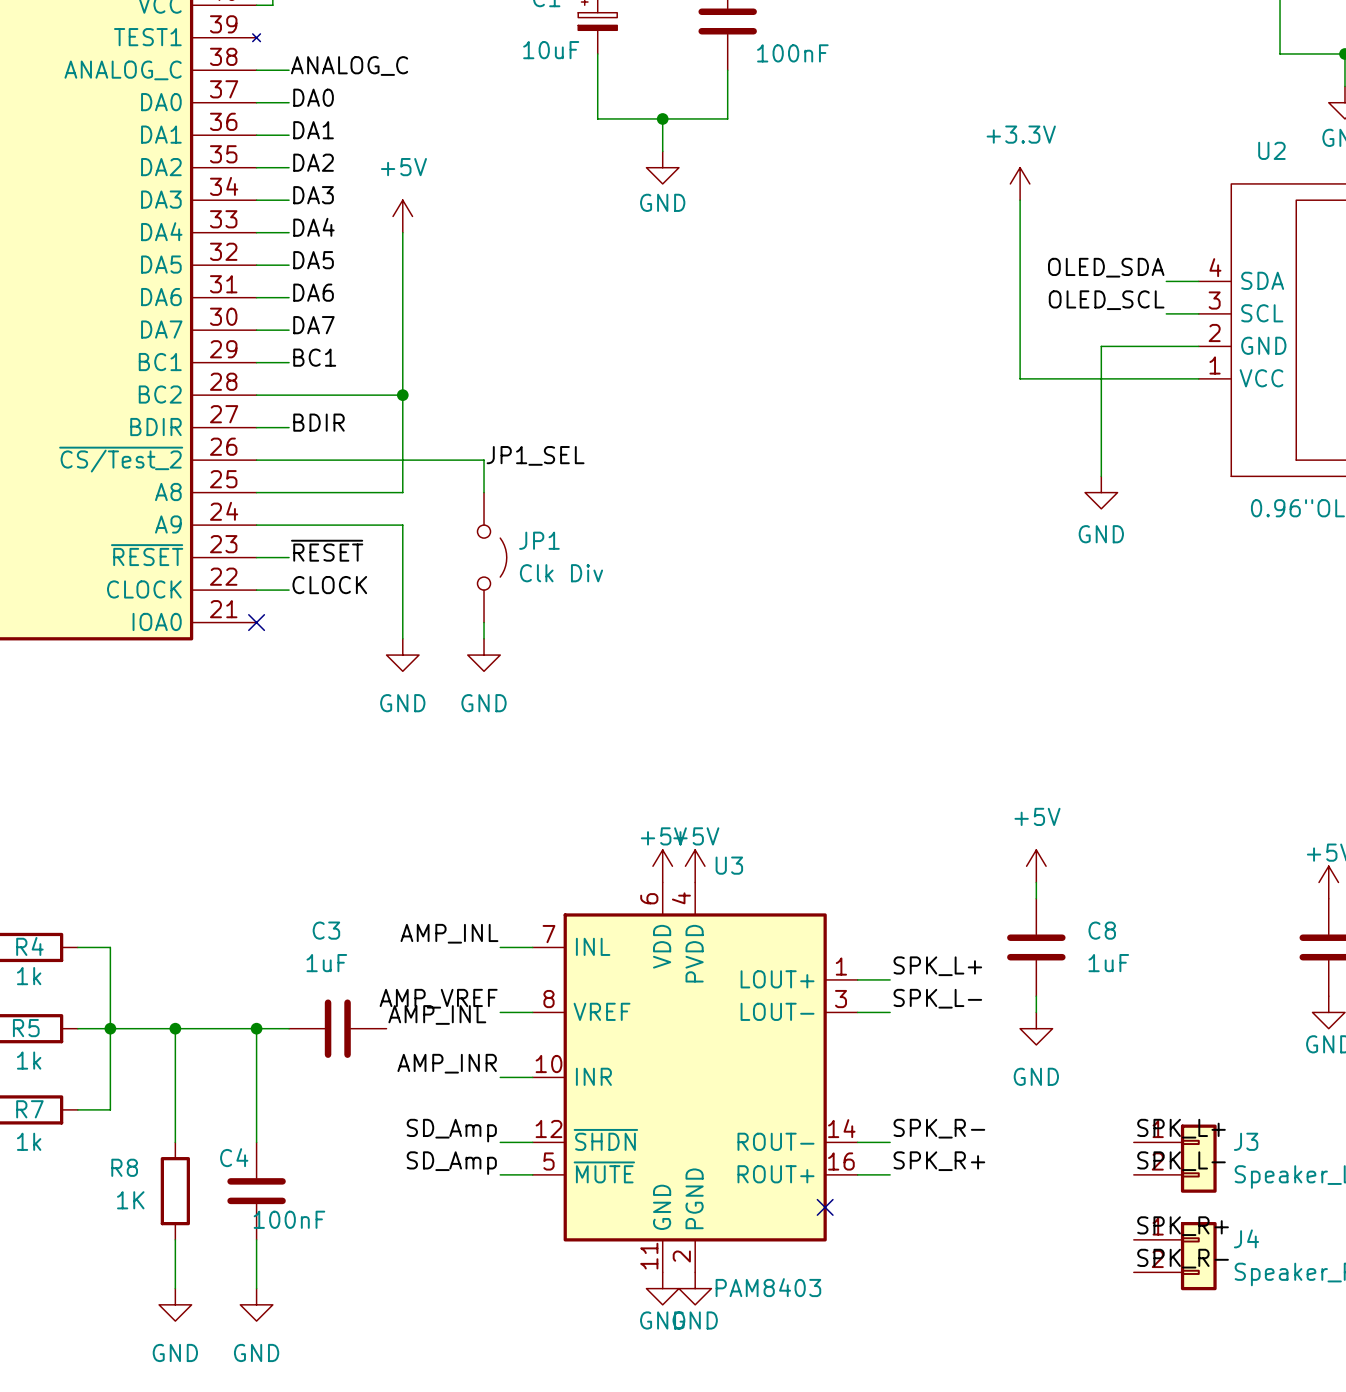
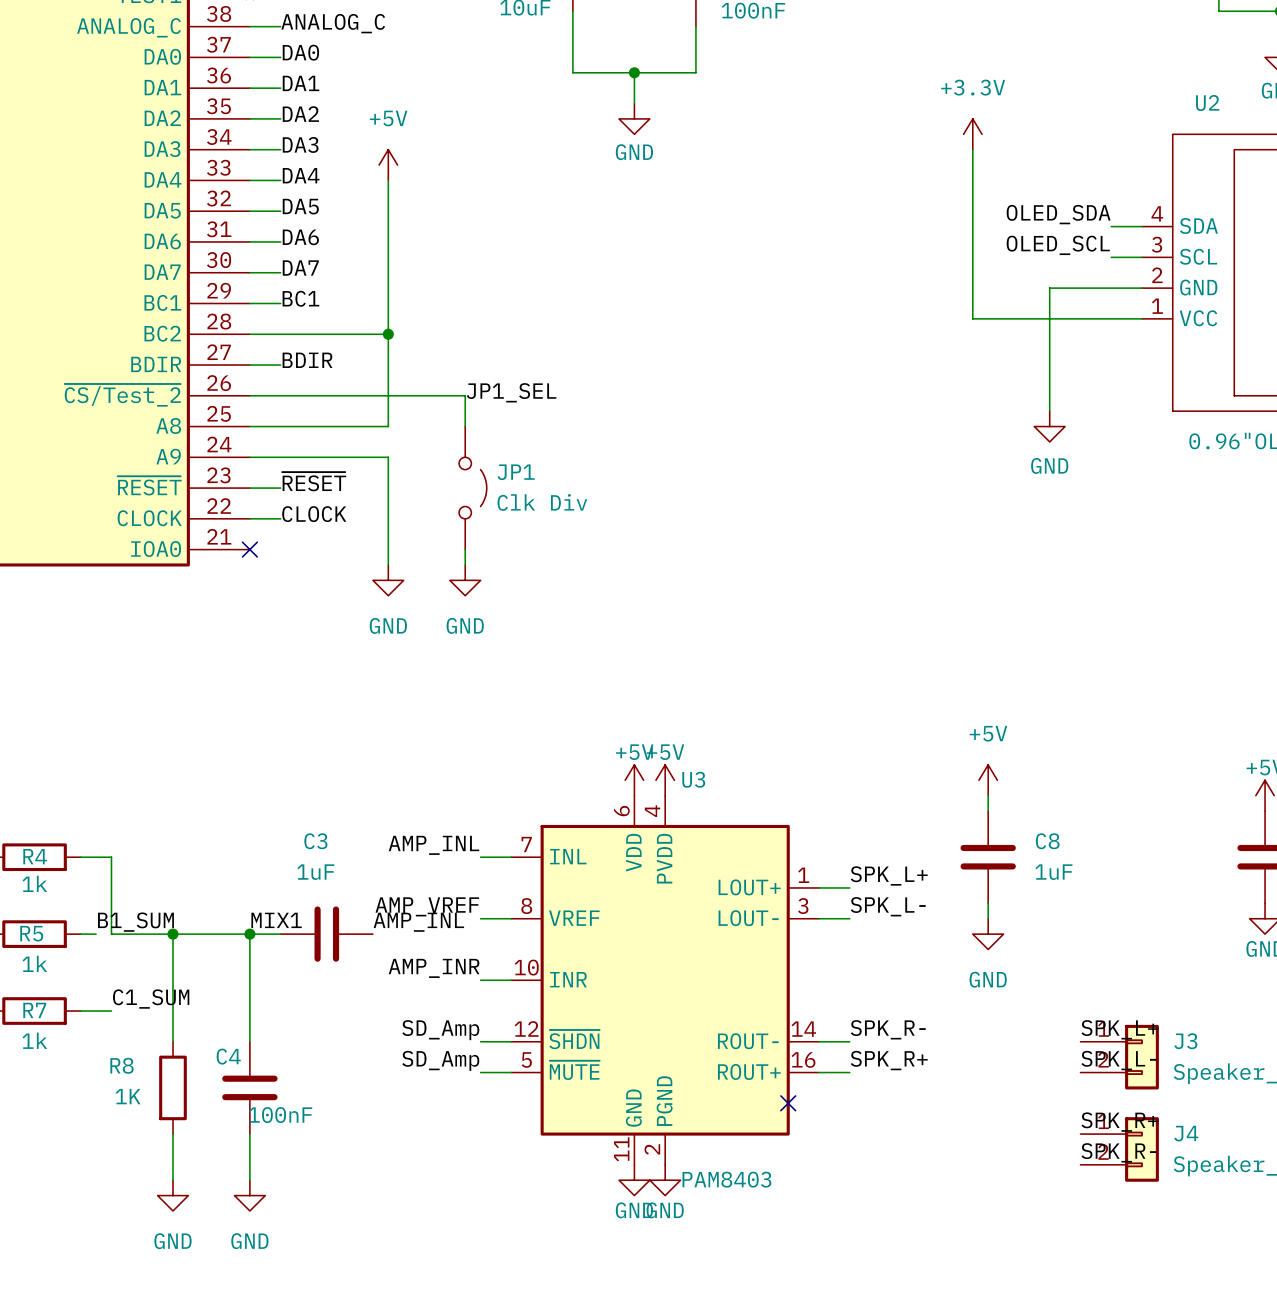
label: none -> B1_SUM (135, 922)
label: none -> MIX1 (276, 920)
wire: (94, 1028) (110, 1028) (110, 1109) -> none
junction: (110, 1028) -> none
label: none -> C1_SUM (151, 999)

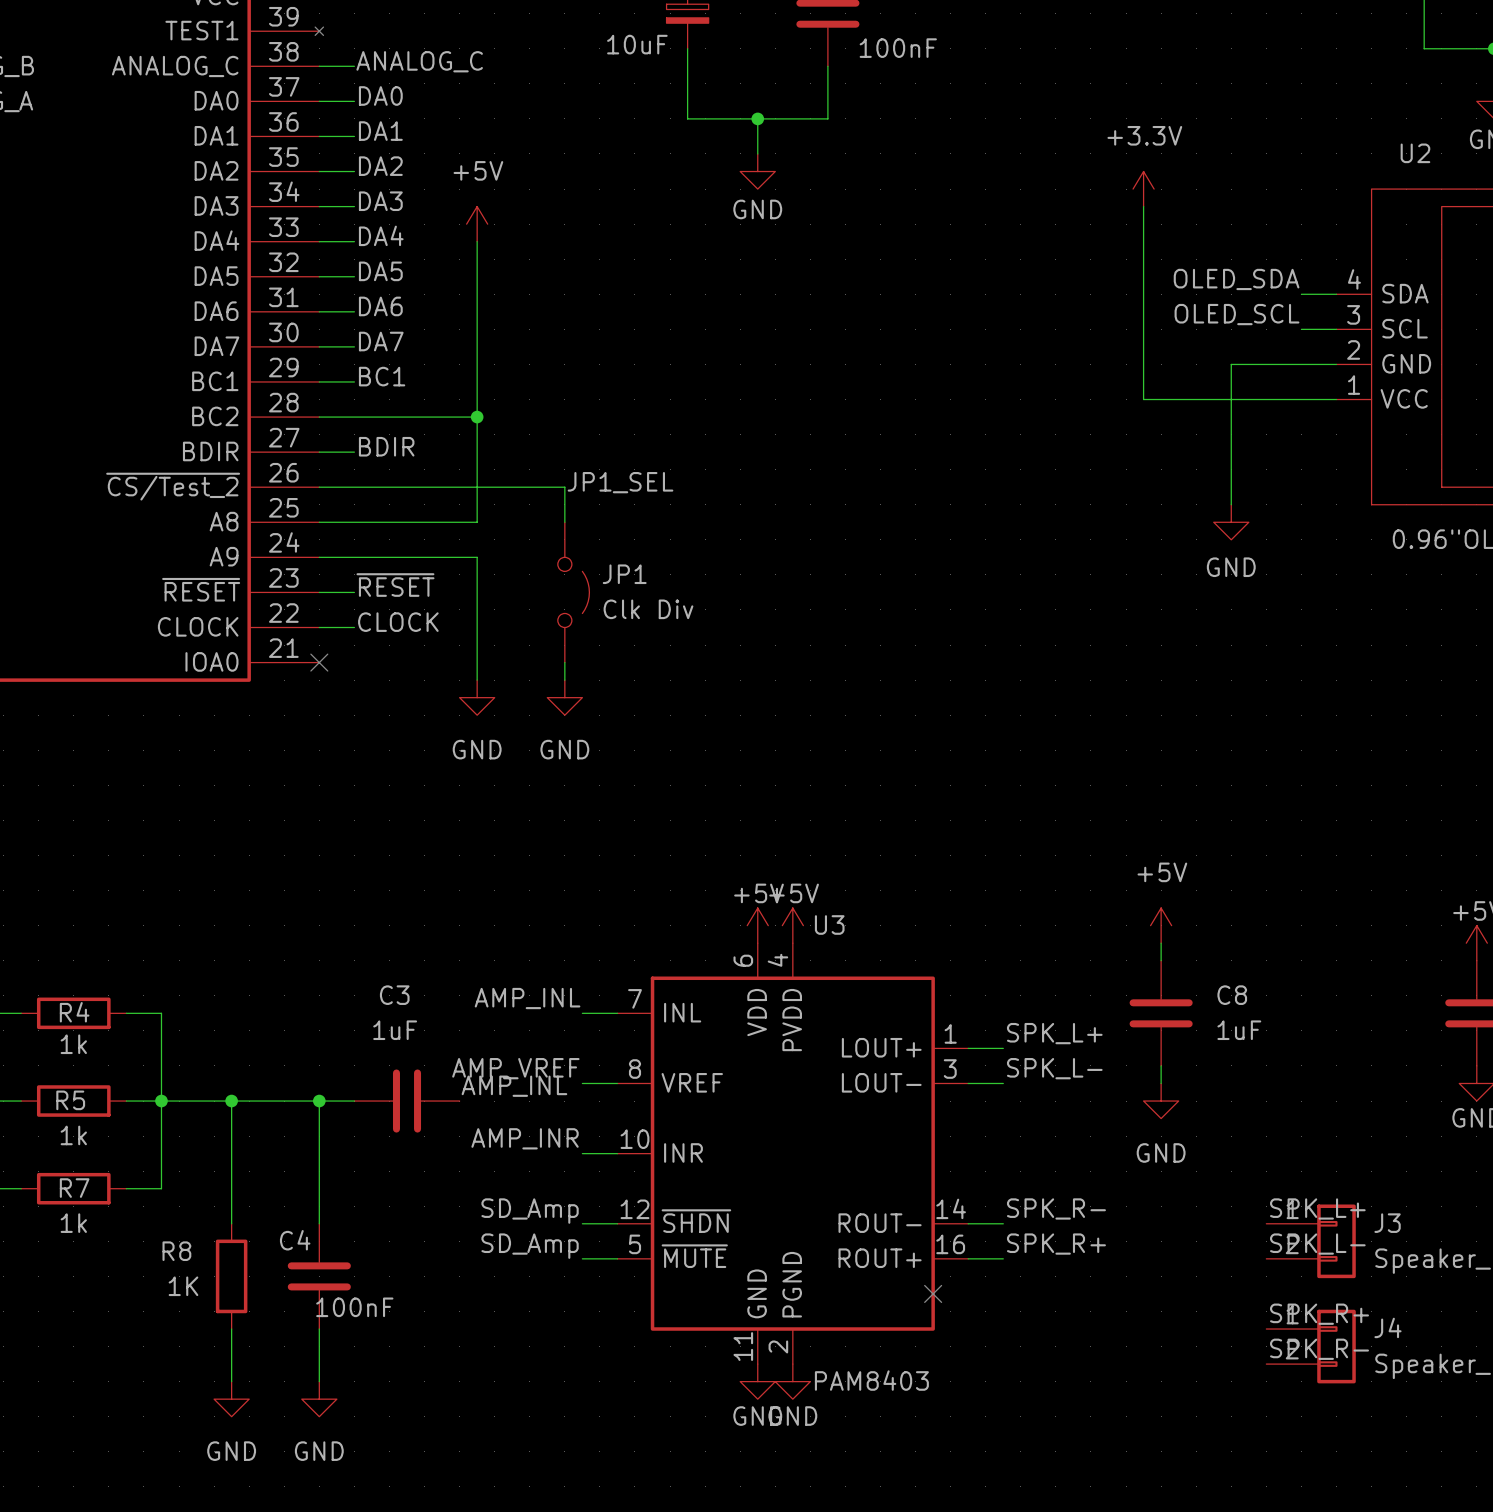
label: MIX1 (276, 920) -> none
label: B1_SUM (135, 922) -> none
wire: none -> (143, 1101) (161, 1101) (161, 1188)
junction: none -> (161, 1101)
label: C1_SUM (151, 999) -> none

